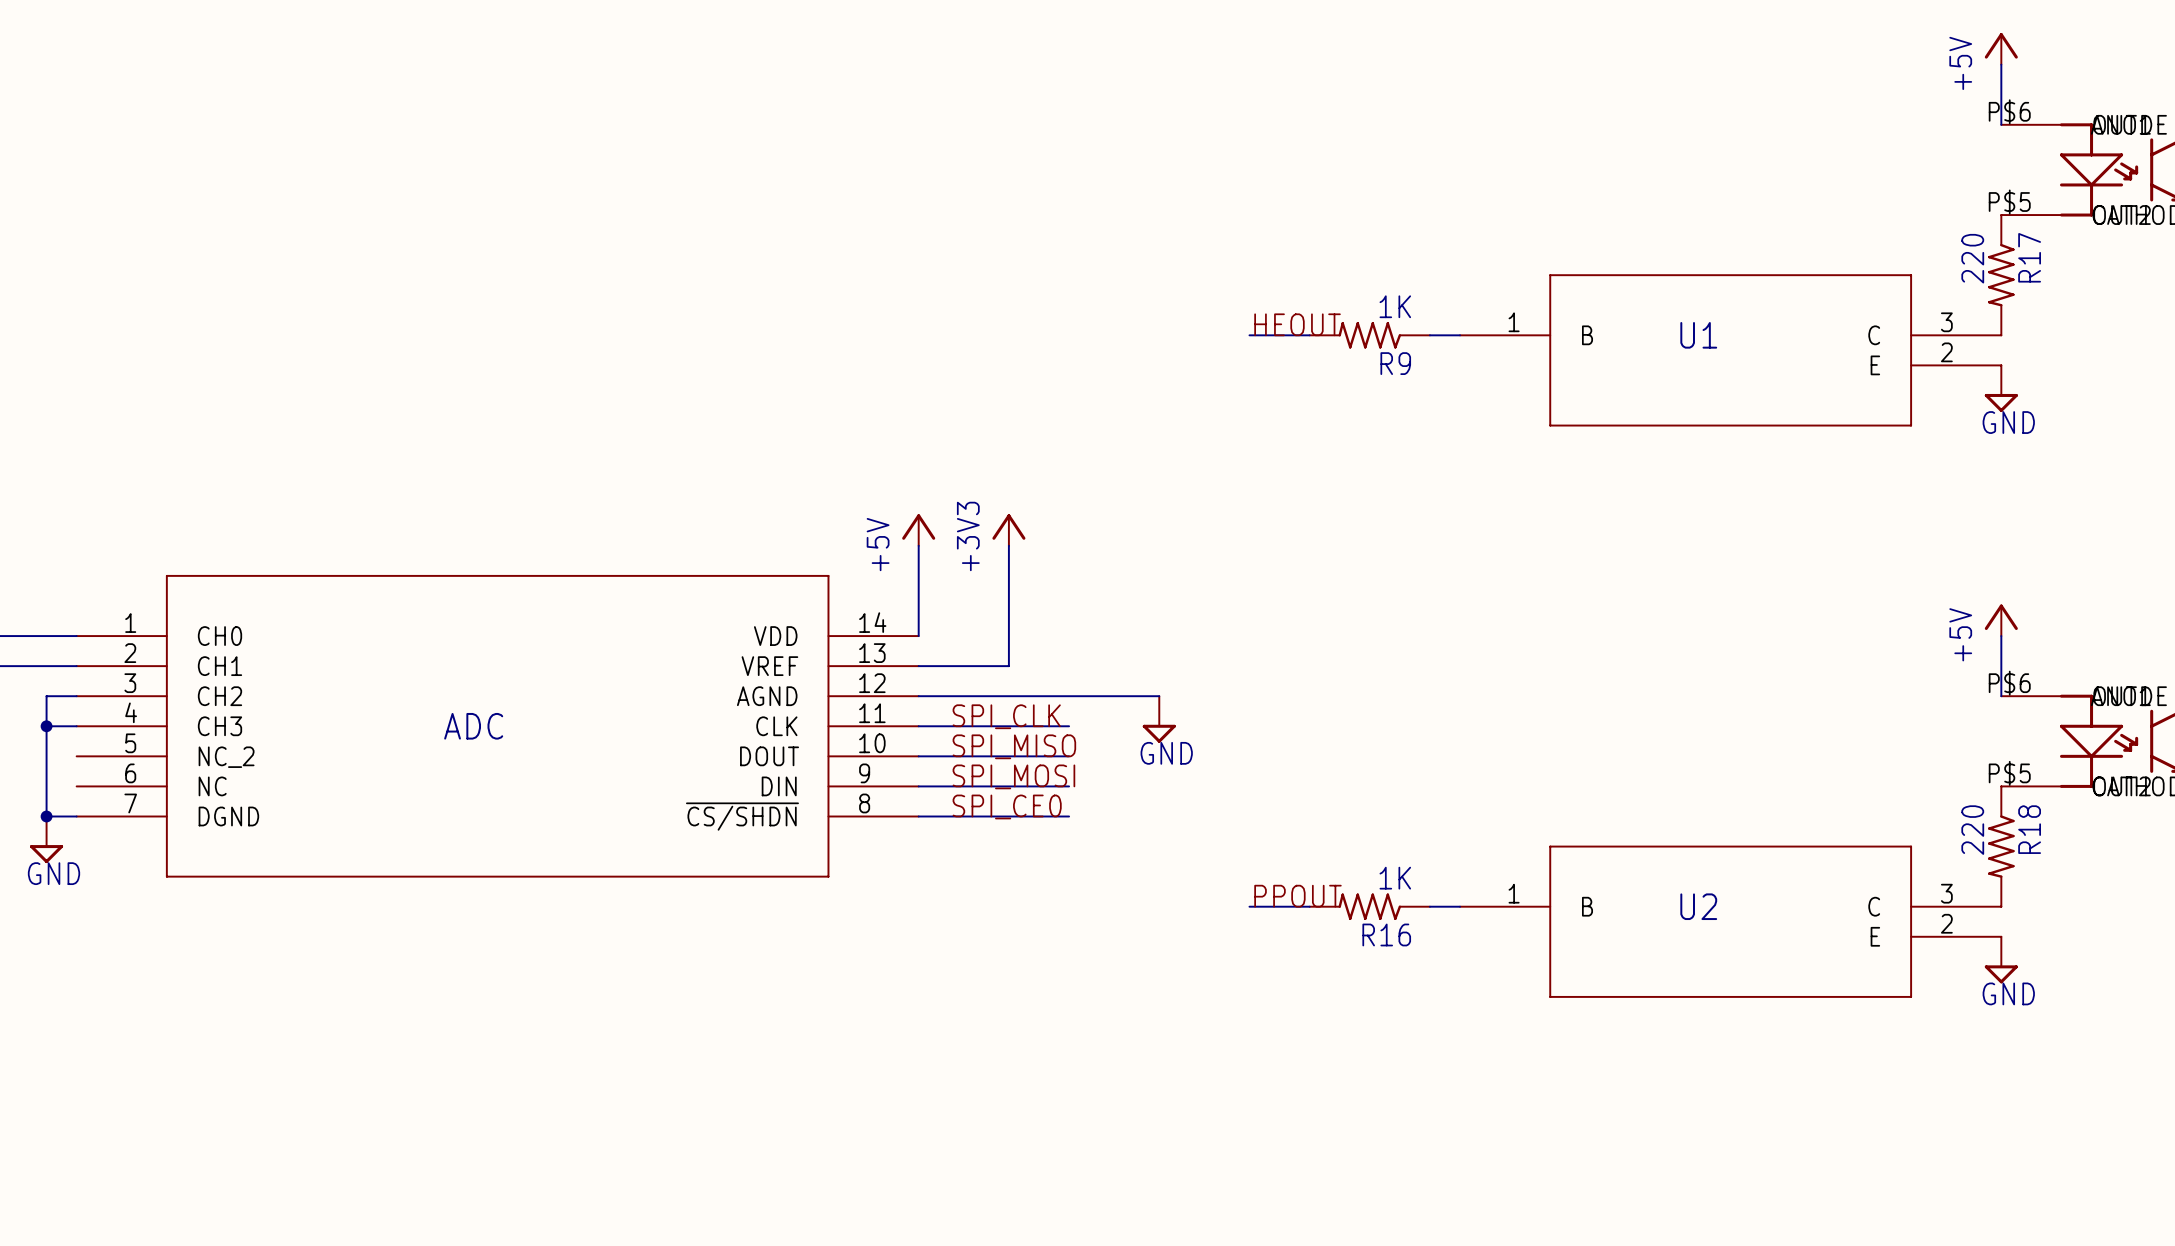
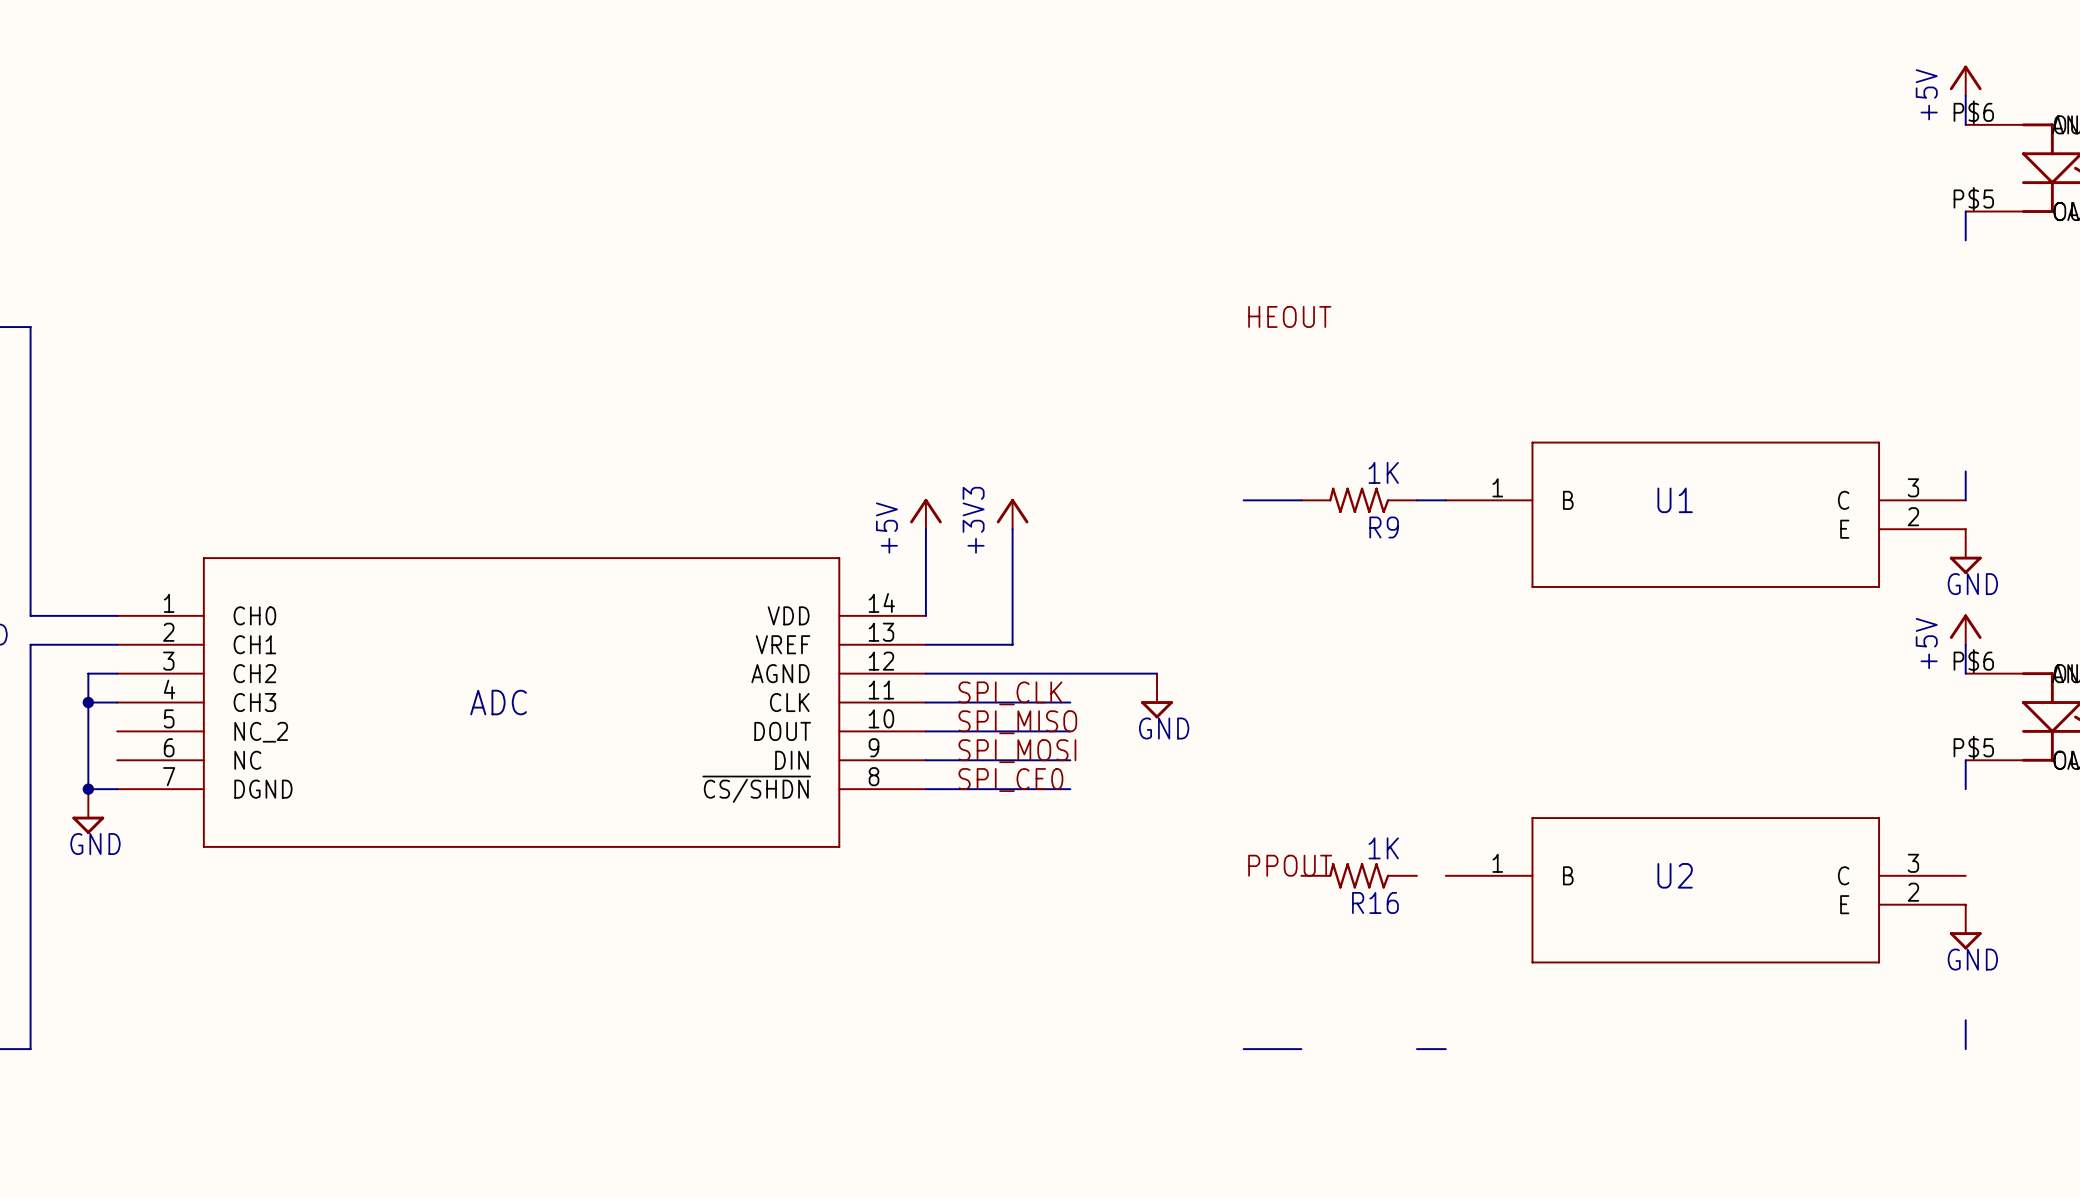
power symbol position: +5V (2001, 48) -> +5V (1965, 80)
R17: 220 (2001, 275) -> none
wire: (1249, 335) (1309, 335) -> (1243, 500) (1301, 500)
R9 position: (1369, 335) -> (1359, 500)
wire: (1429, 335) (1460, 335) -> (1416, 500) (1445, 500)
U1 position: (1730, 350) -> (1705, 514)
power symbol position: GND (2001, 388) -> GND (1965, 551)
wire: none -> (1965, 471) (1965, 500)
power symbol position: +5V (2001, 620) -> +5V (1965, 629)
R18: 220 (2001, 846) -> none
wire: (1249, 906) (1309, 906) -> (1243, 1049) (1301, 1049)
wire: (1429, 906) (1460, 906) -> (1416, 1049) (1445, 1049)
wire: none -> (1965, 1020) (1965, 1049)

